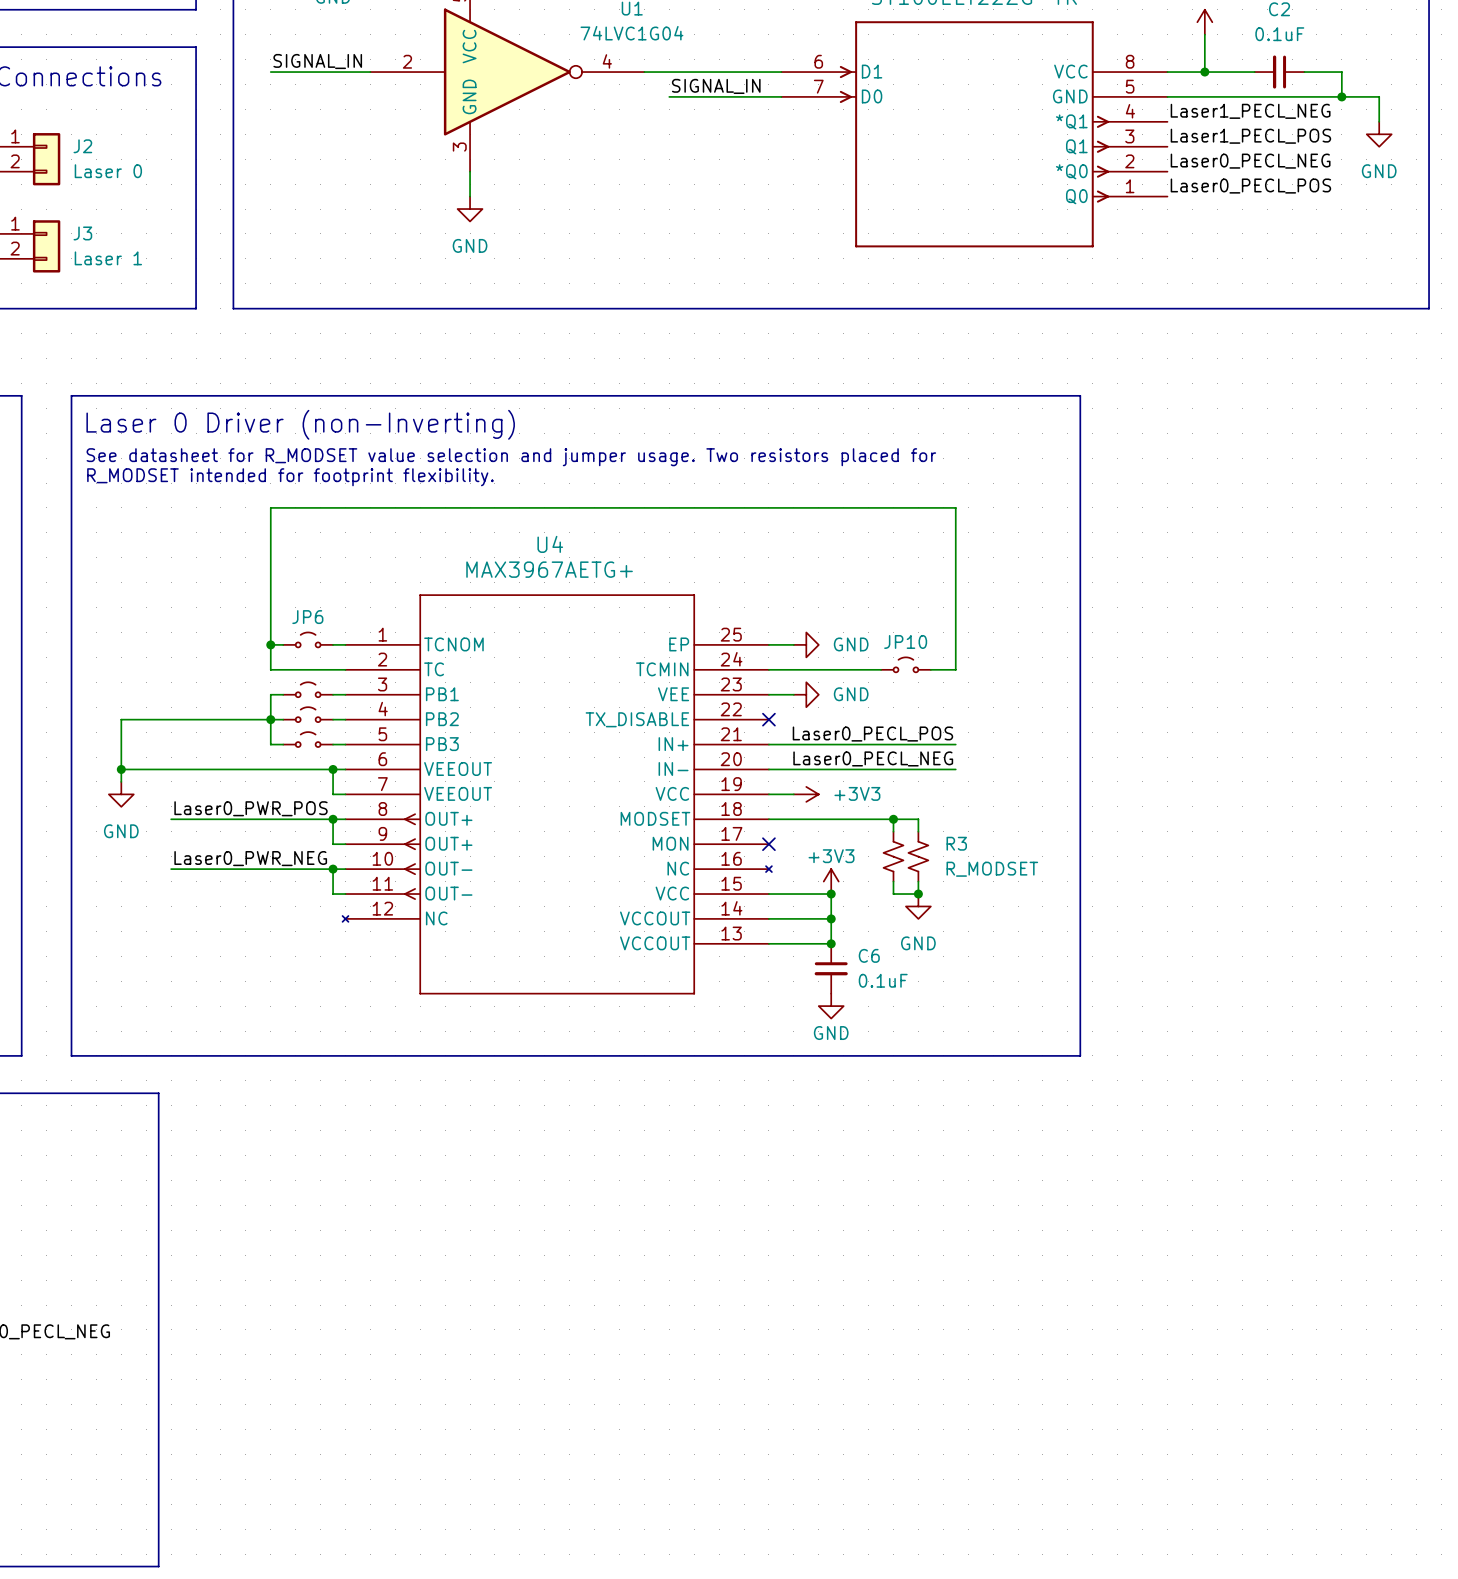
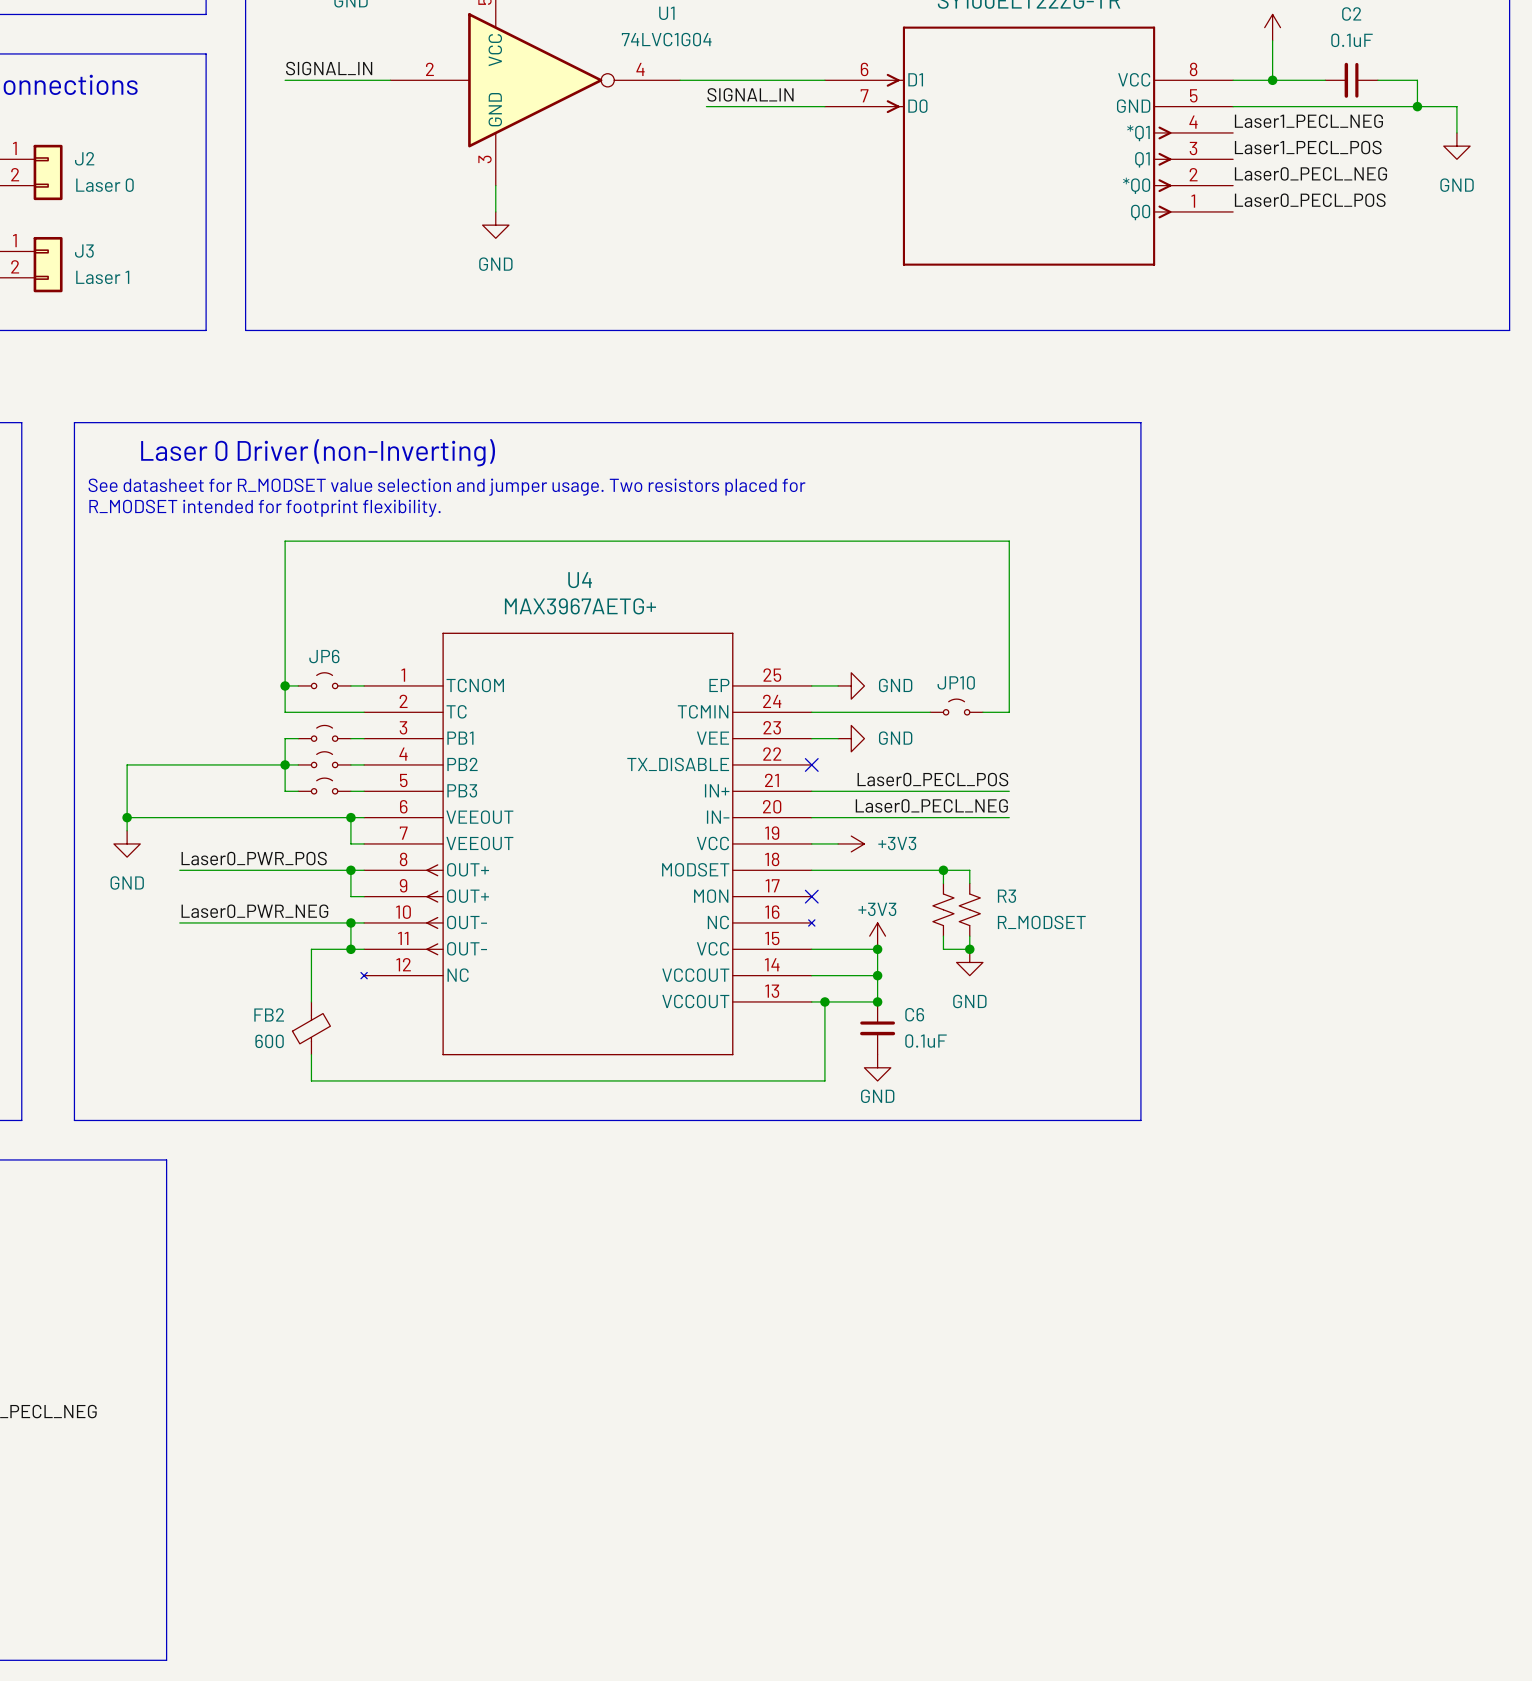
wire: none -> (350, 949) (311, 949) (311, 1001)
junction: none -> (350, 949)
wire: none -> (824, 1001) (824, 1080) (311, 1080) (311, 1054)
junction: none -> (824, 1001)
FB2: none -> 600 (311, 1028)

